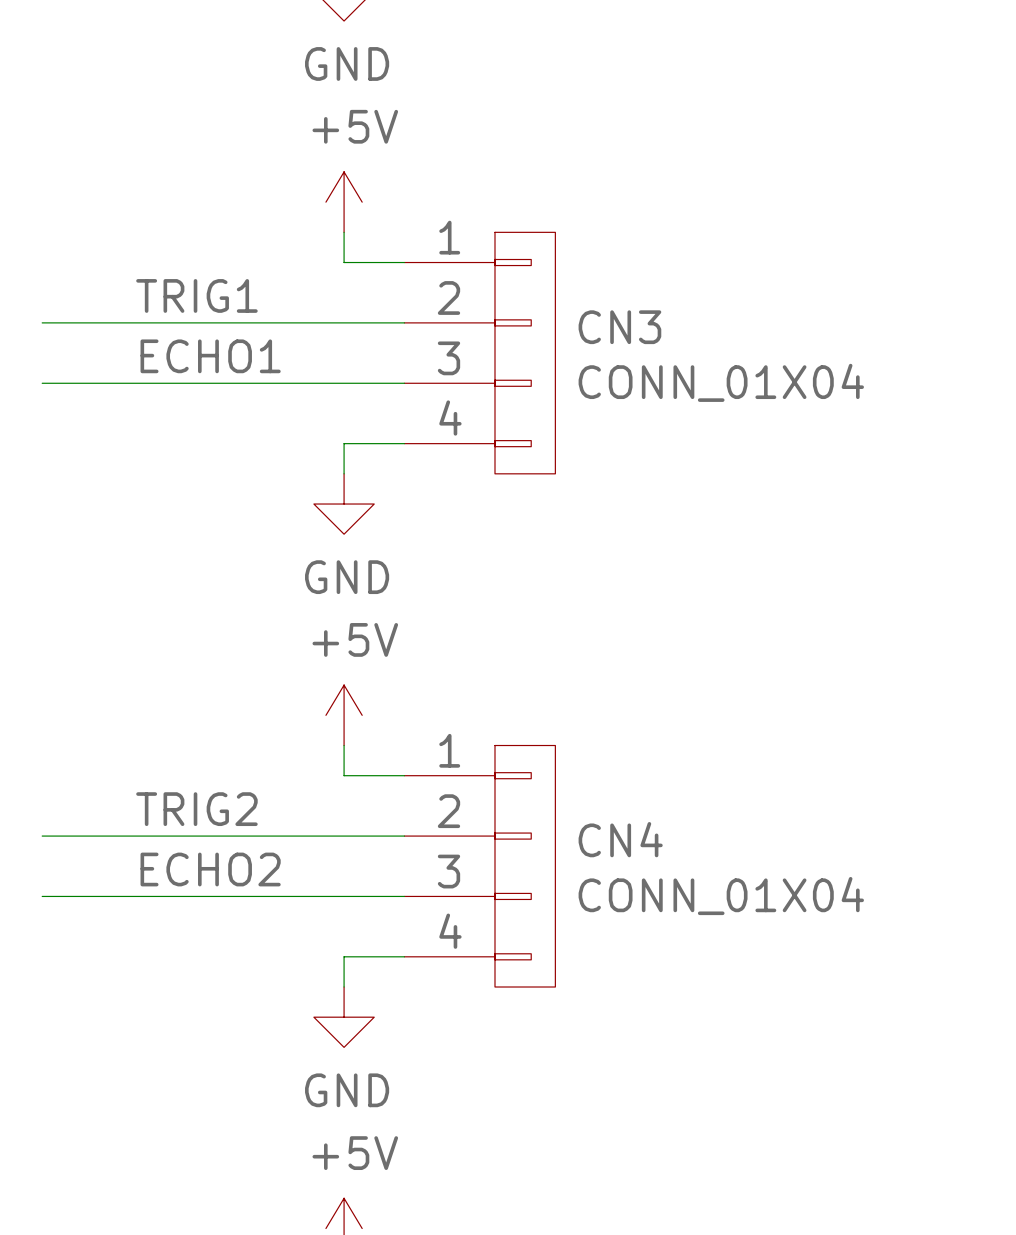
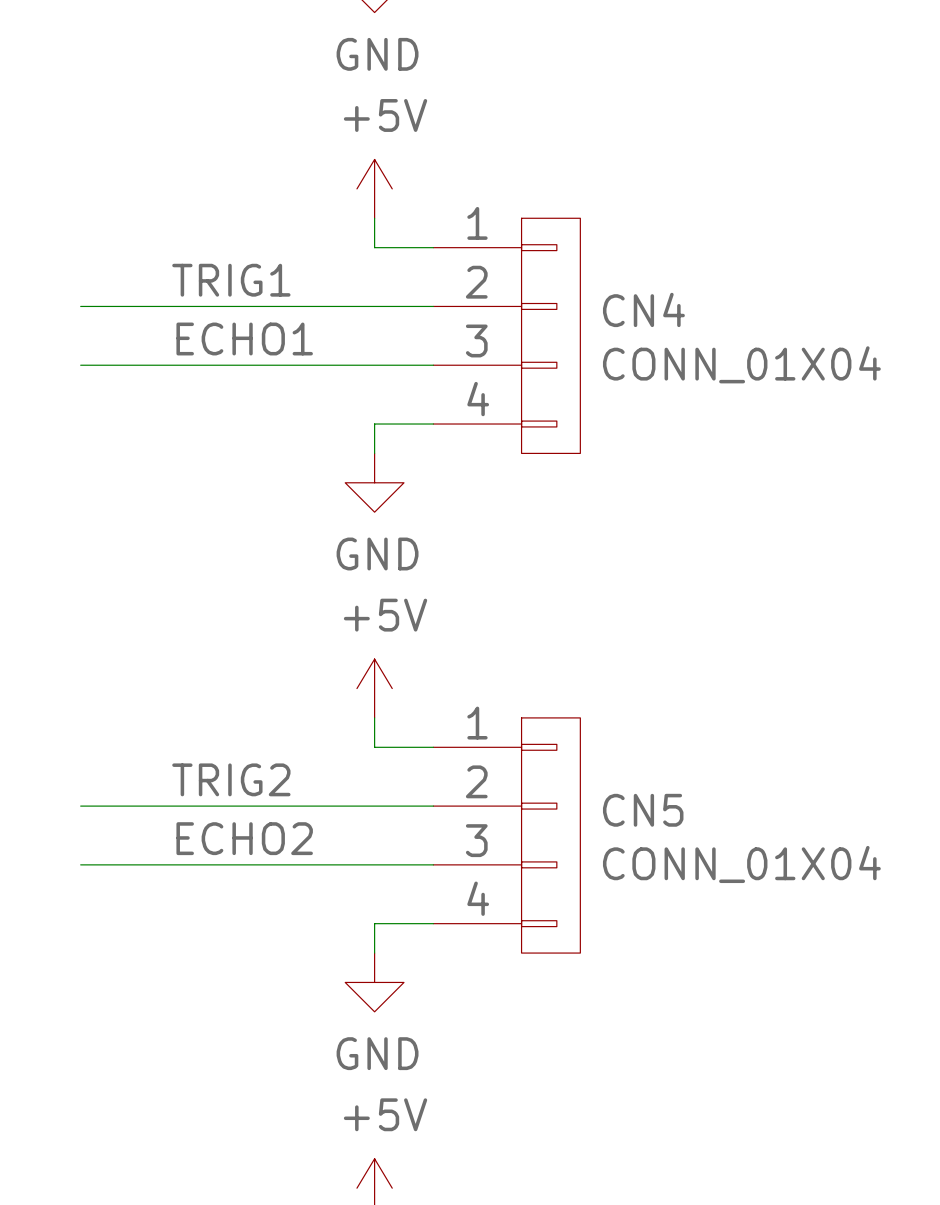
CN3 name: CN3 (619, 327) -> CN4 (643, 309)
CN4 name: CN4 (620, 839) -> CN5 (643, 810)

